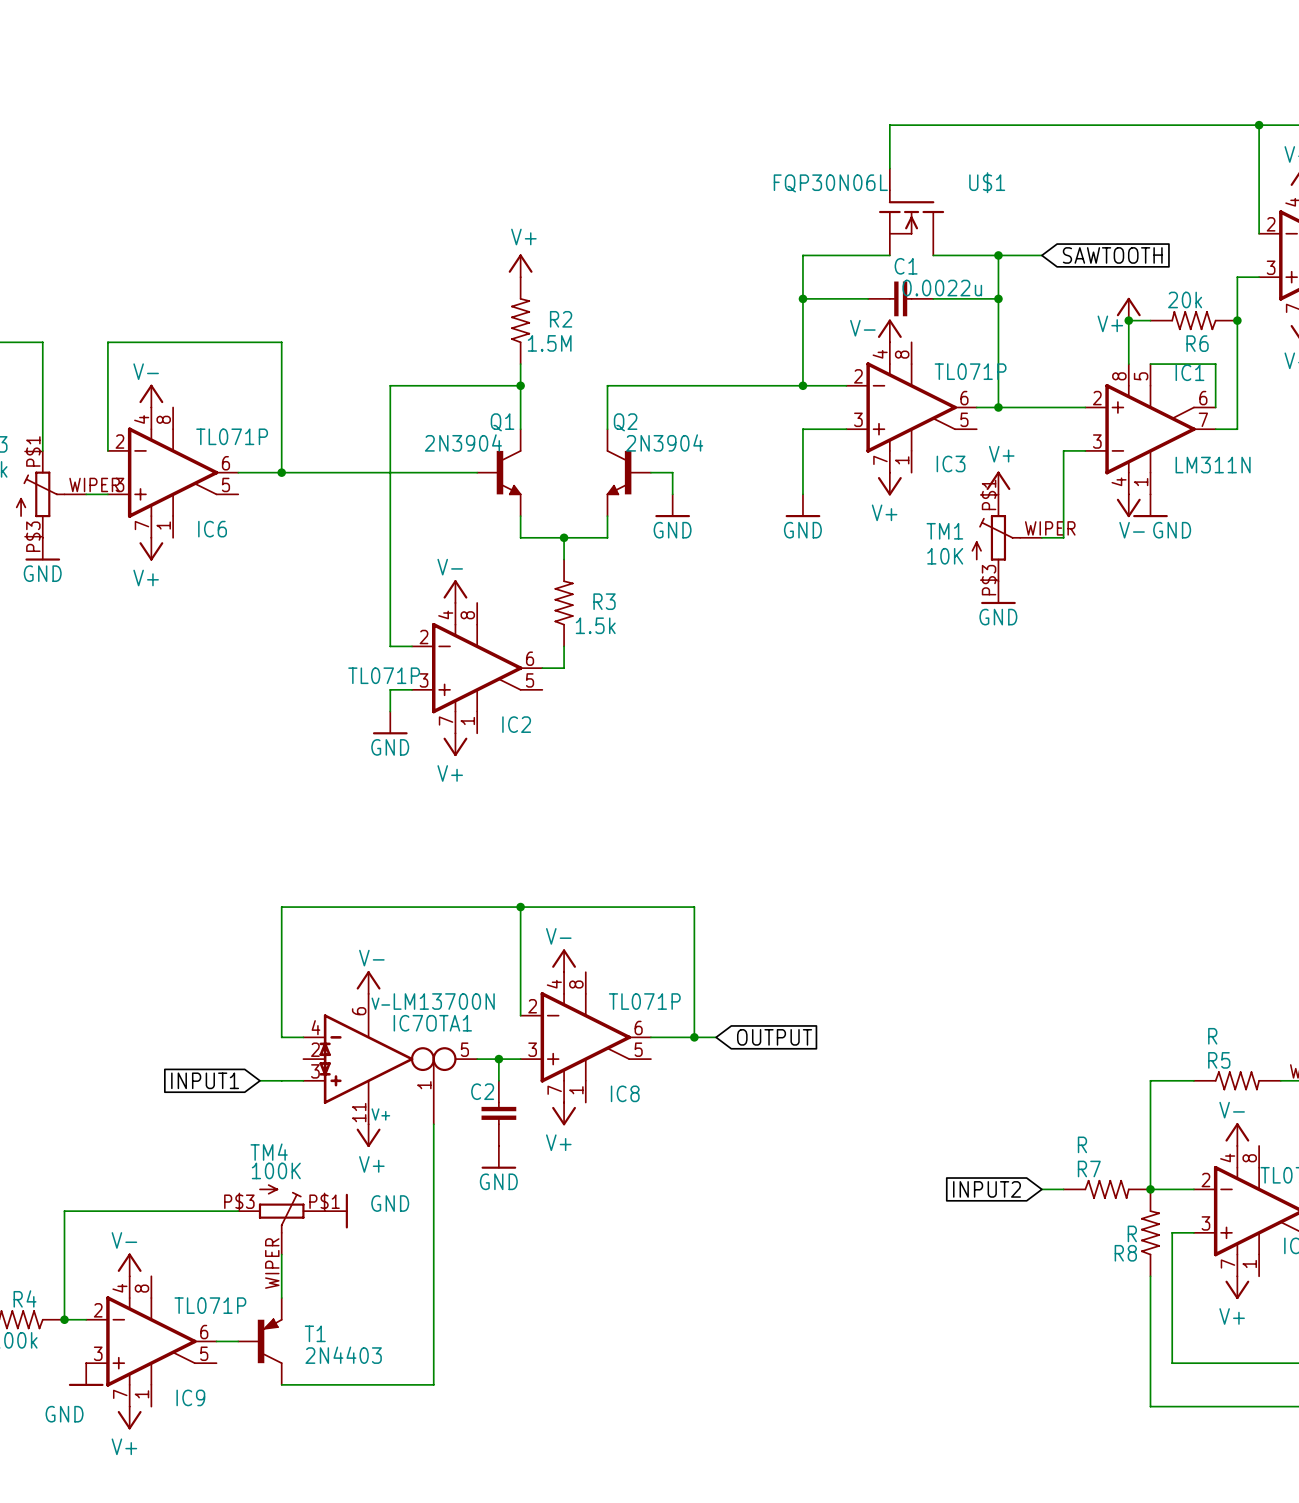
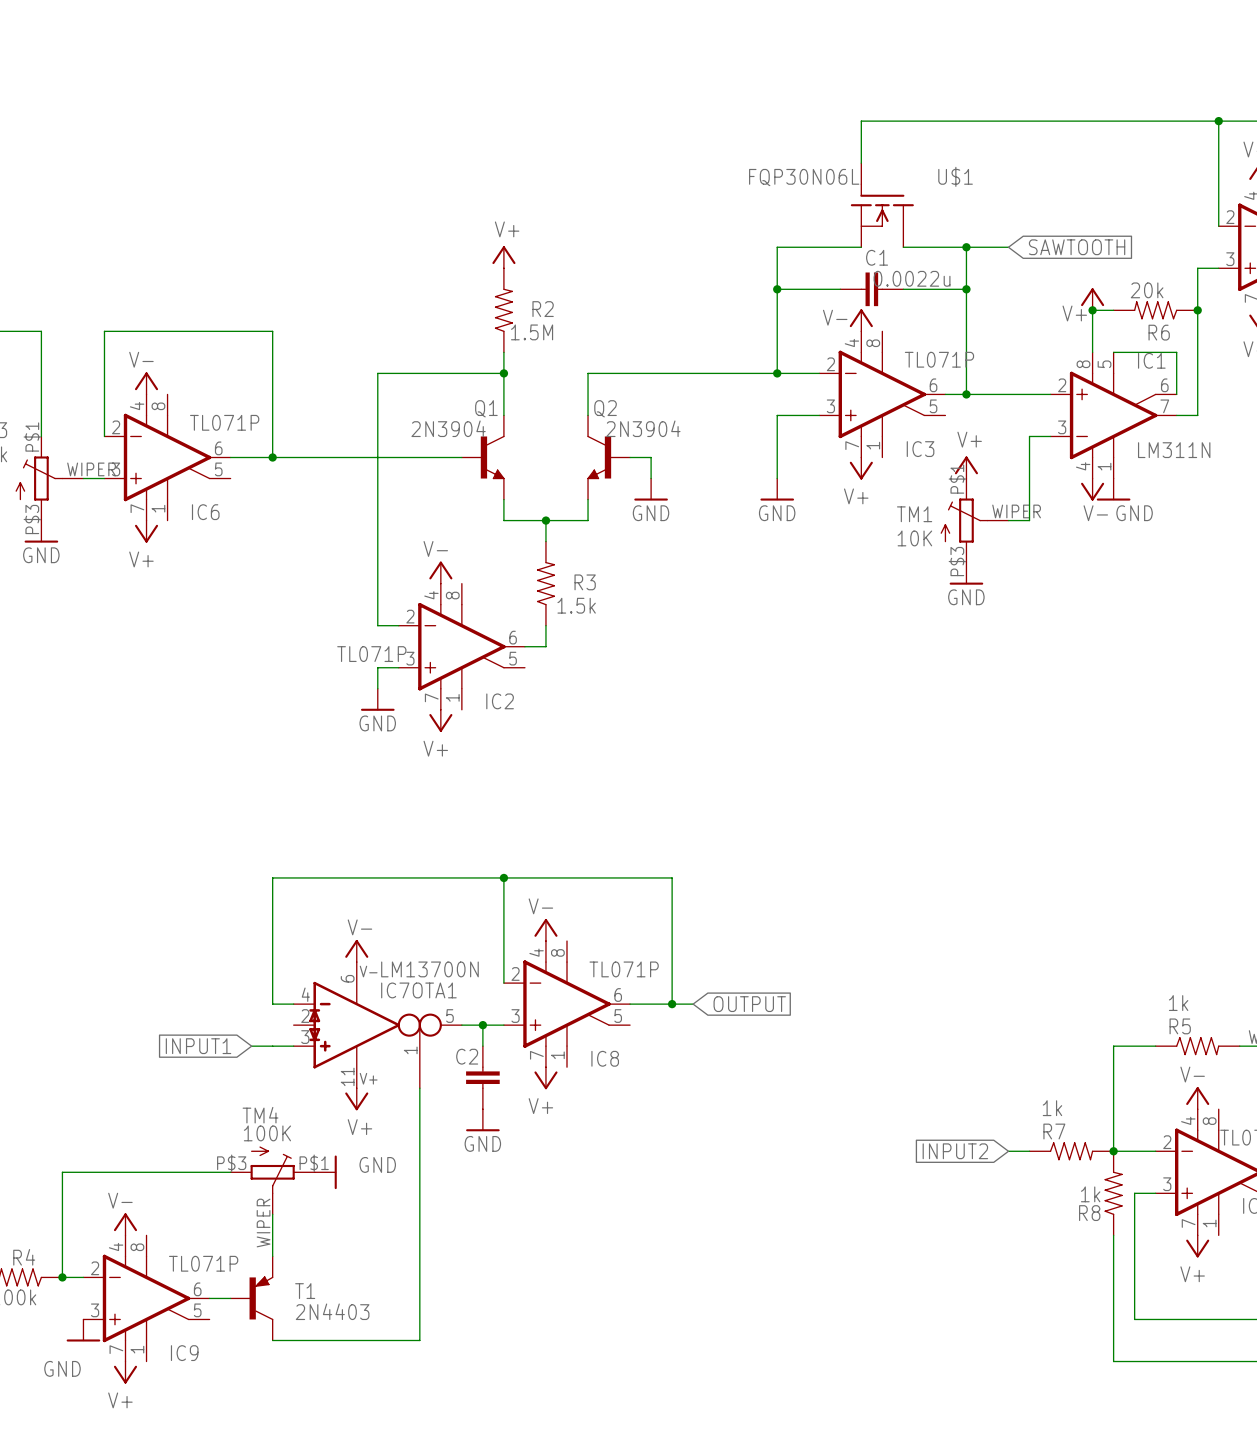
R5 value: R (1212, 1036) -> 1k (1178, 1003)
R7 value: R (1082, 1144) -> 1k (1052, 1108)
R8 value: R (1132, 1233) -> 1k (1090, 1194)

